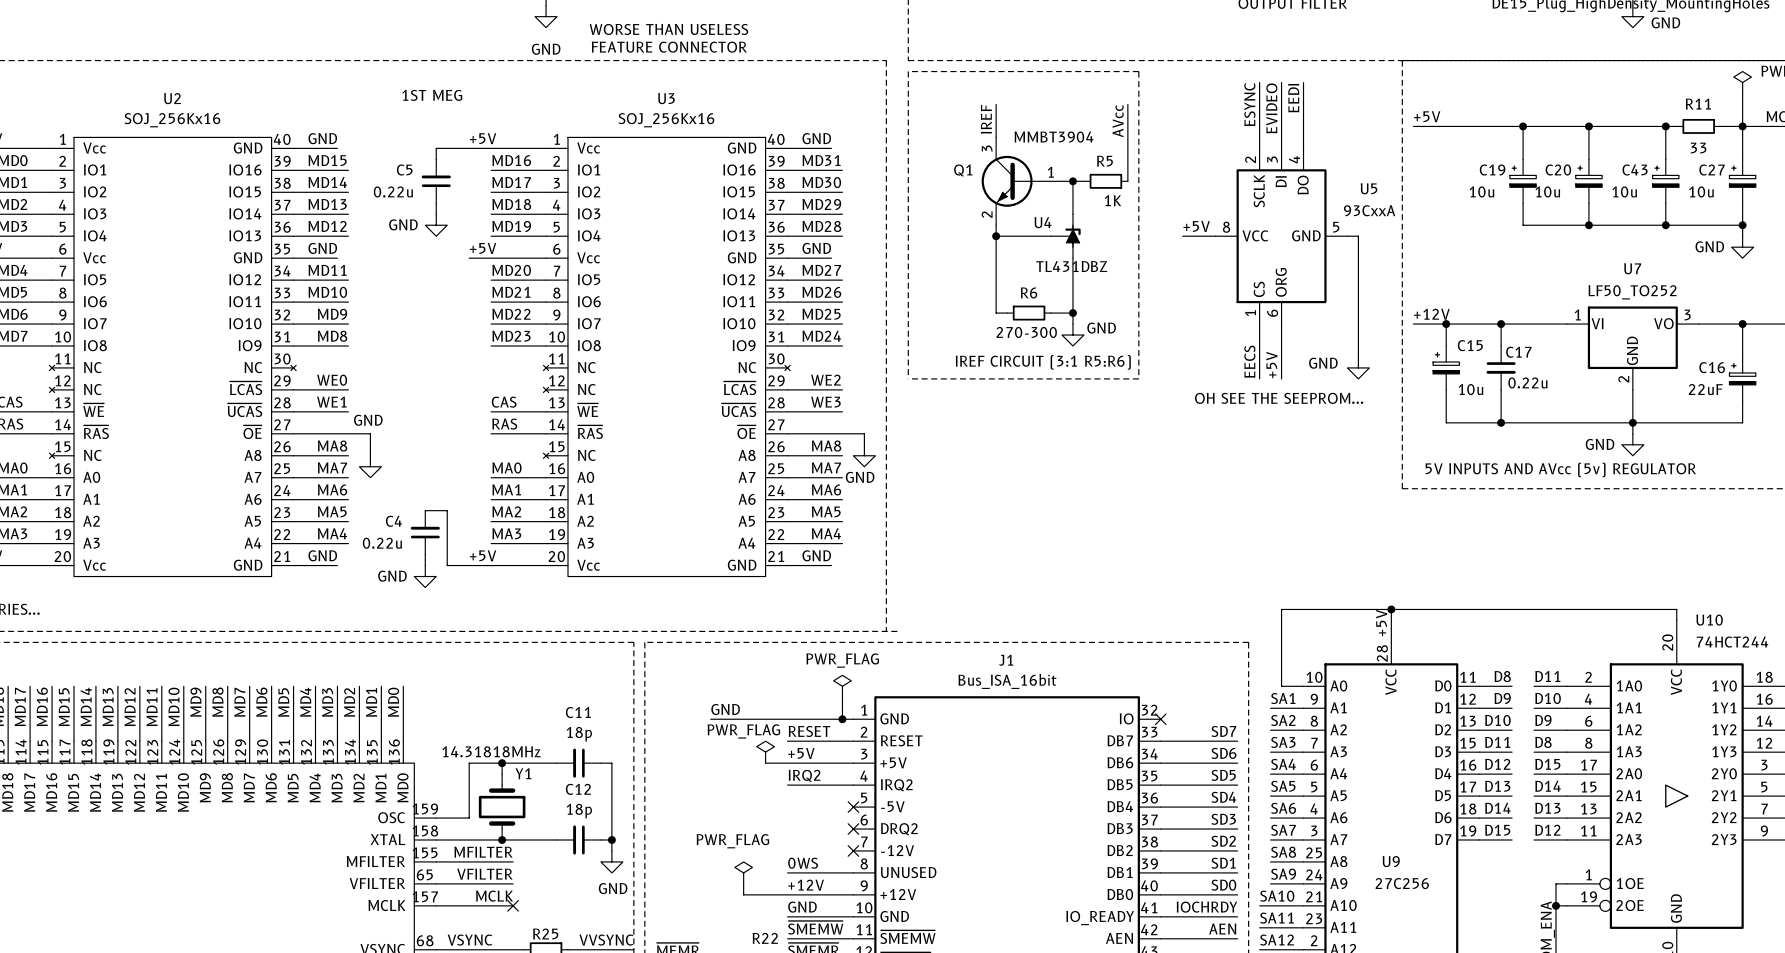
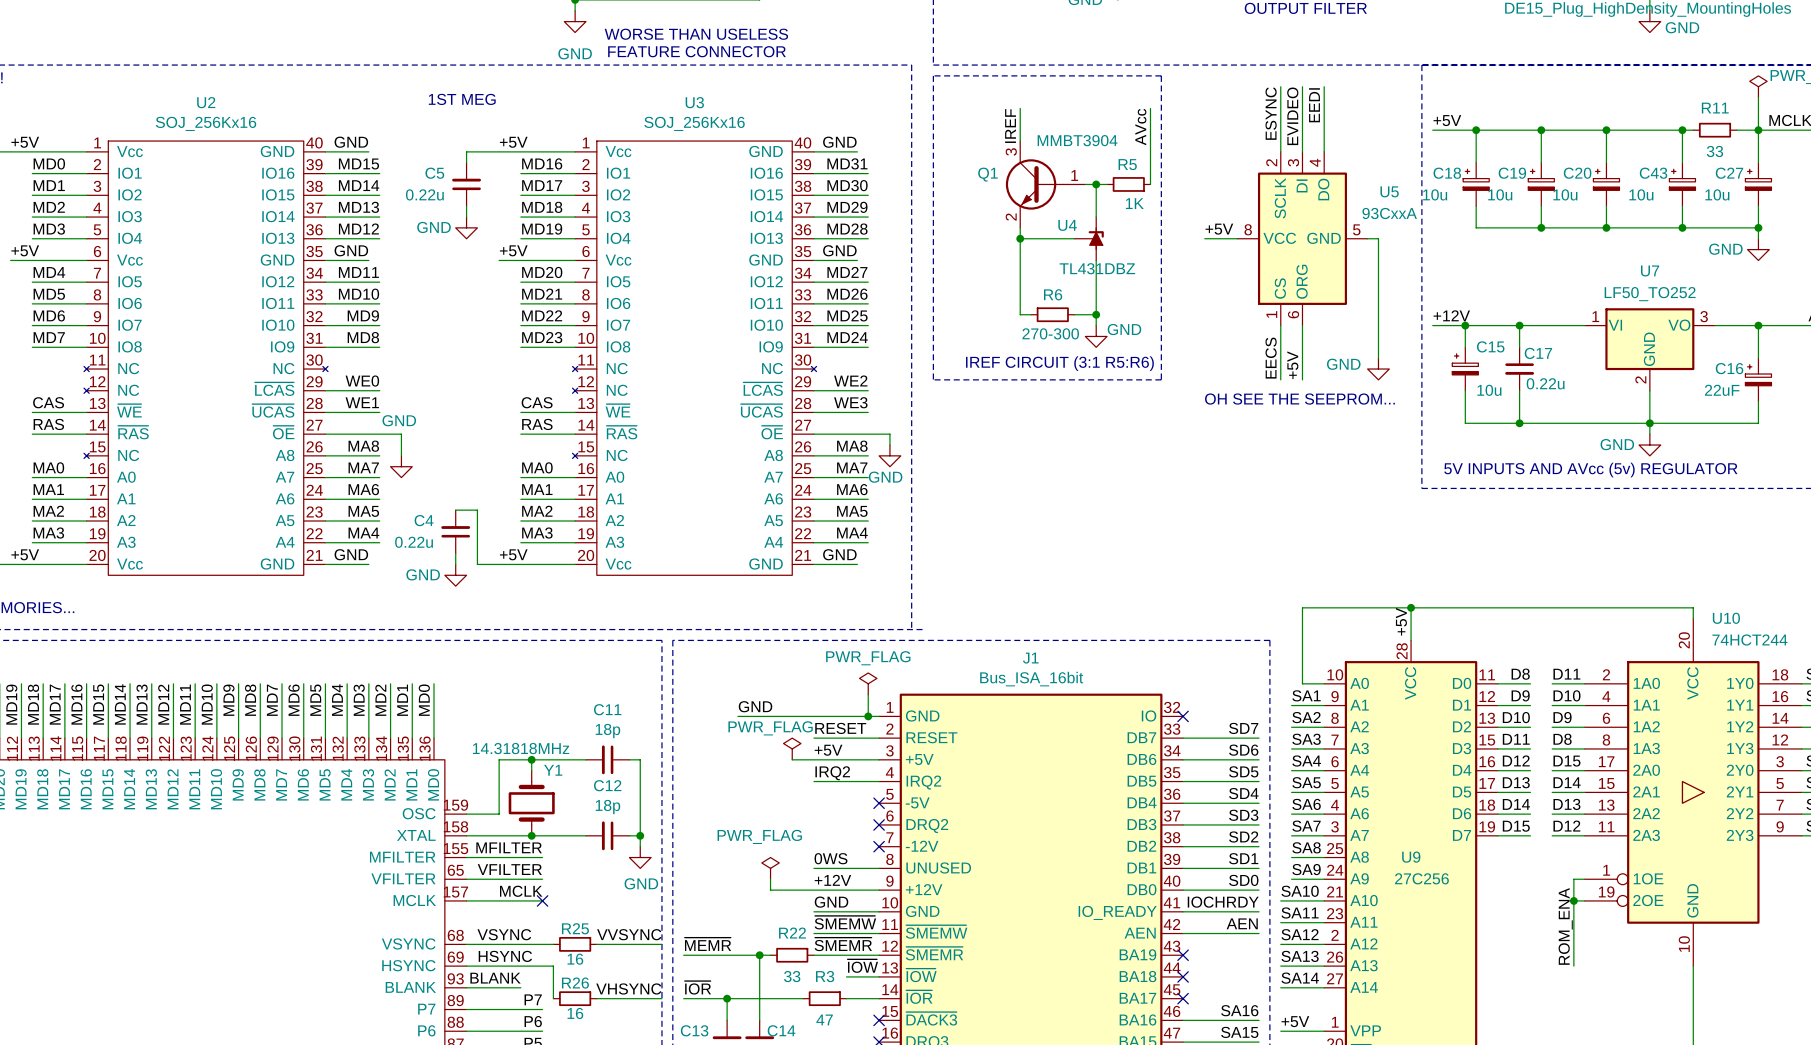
wire: none -> (1476, 130) (1476, 162)
junction: none -> (1476, 130)
C18: none -> 10u (1476, 184)
wire: none -> (1476, 206) (1476, 227) (1541, 227)
junction: none -> (1541, 227)

